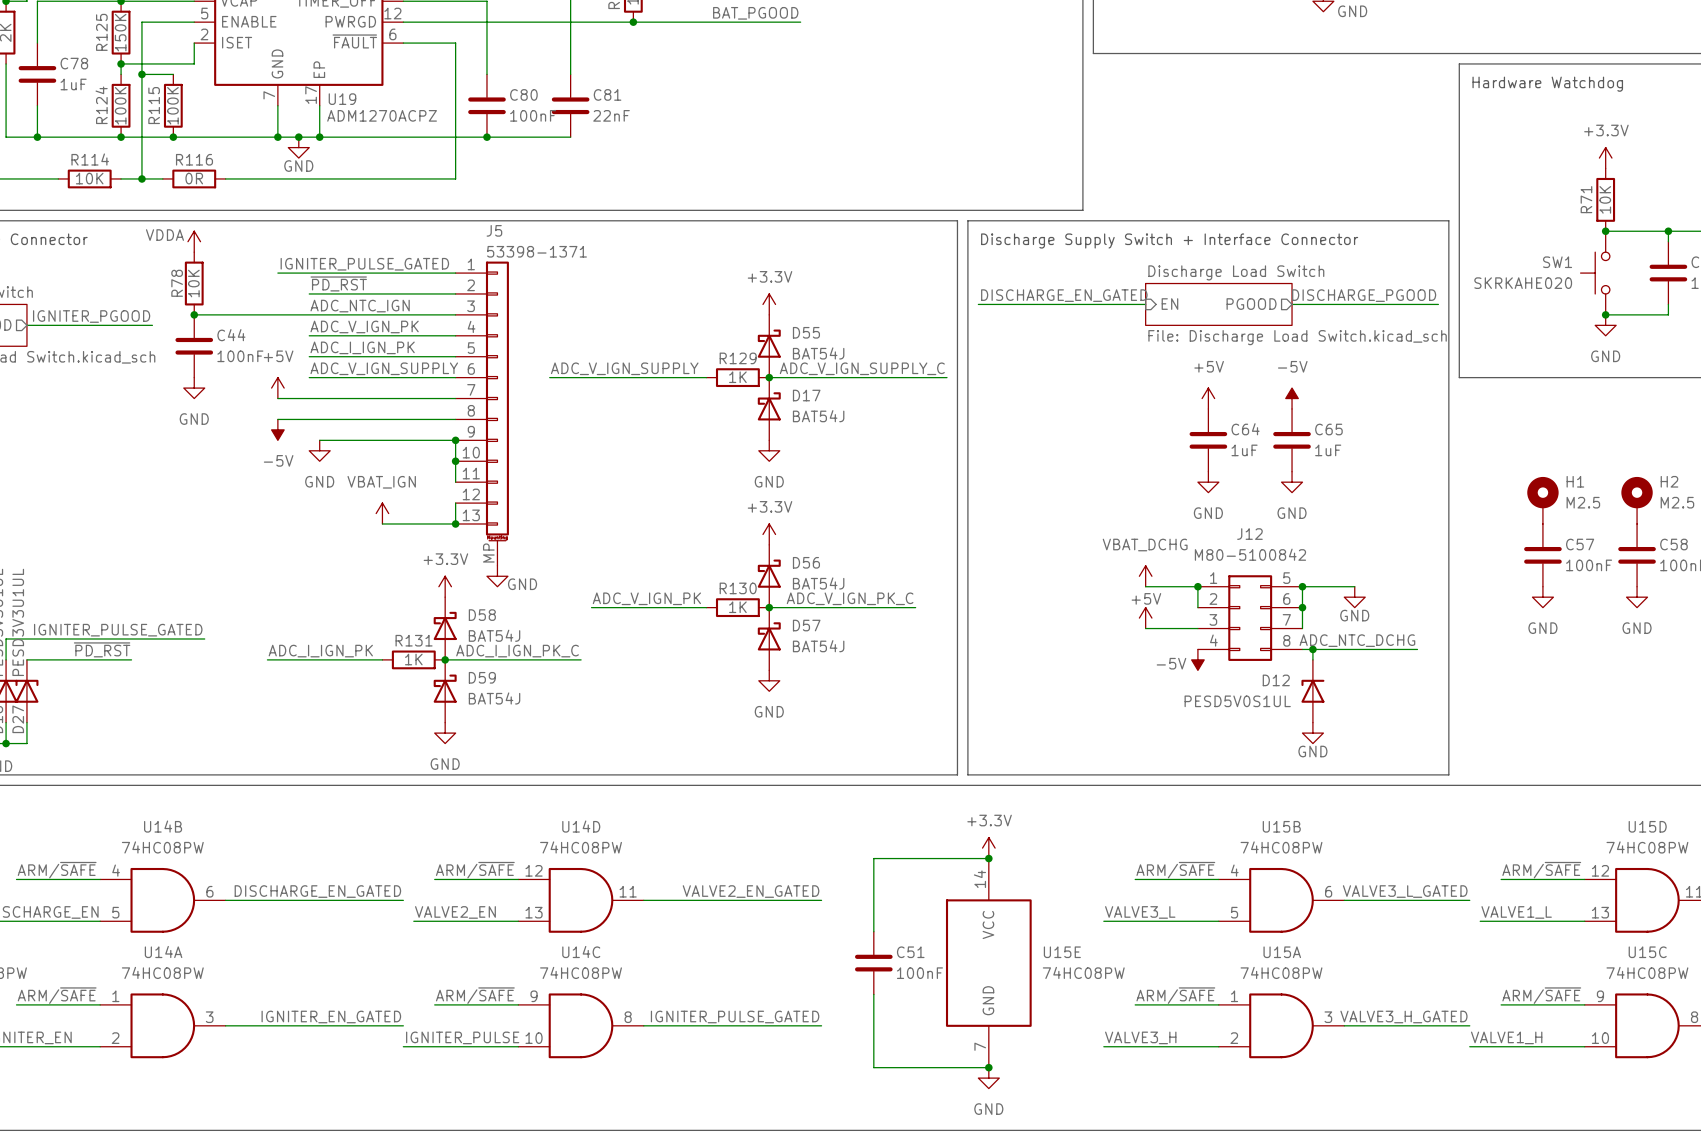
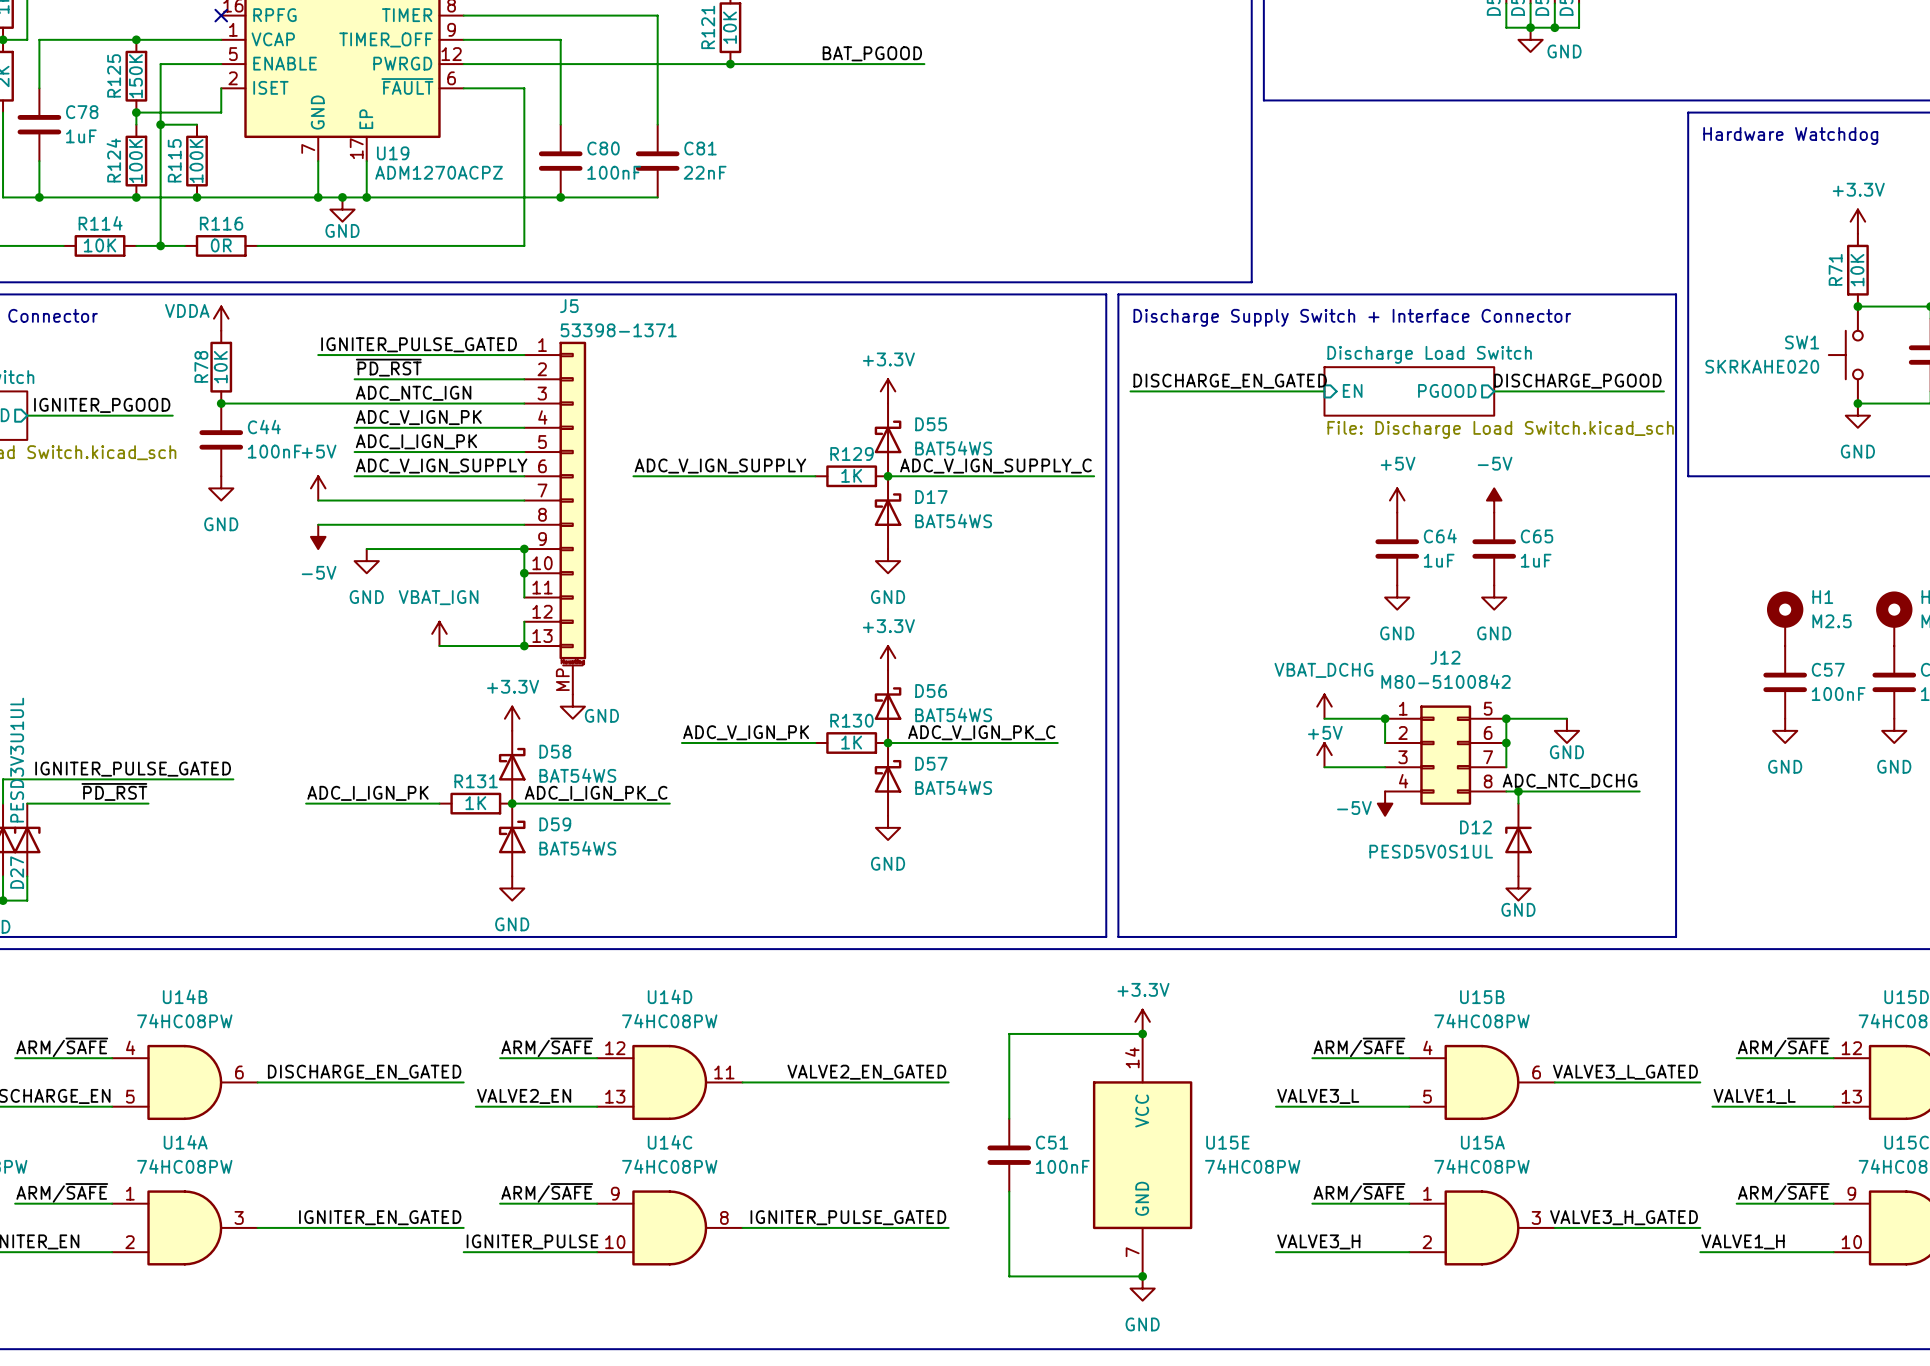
D55 value: BAT54J (818, 353) -> BAT54WS (953, 448)
D17 value: BAT54J (818, 416) -> BAT54WS (953, 521)
D56 value: BAT54J (818, 583) -> BAT54WS (953, 714)
D58 value: BAT54J (494, 635) -> BAT54WS (577, 775)
D57 value: BAT54J (818, 646) -> BAT54WS (953, 787)
D59 value: BAT54J (494, 698) -> BAT54WS (577, 848)

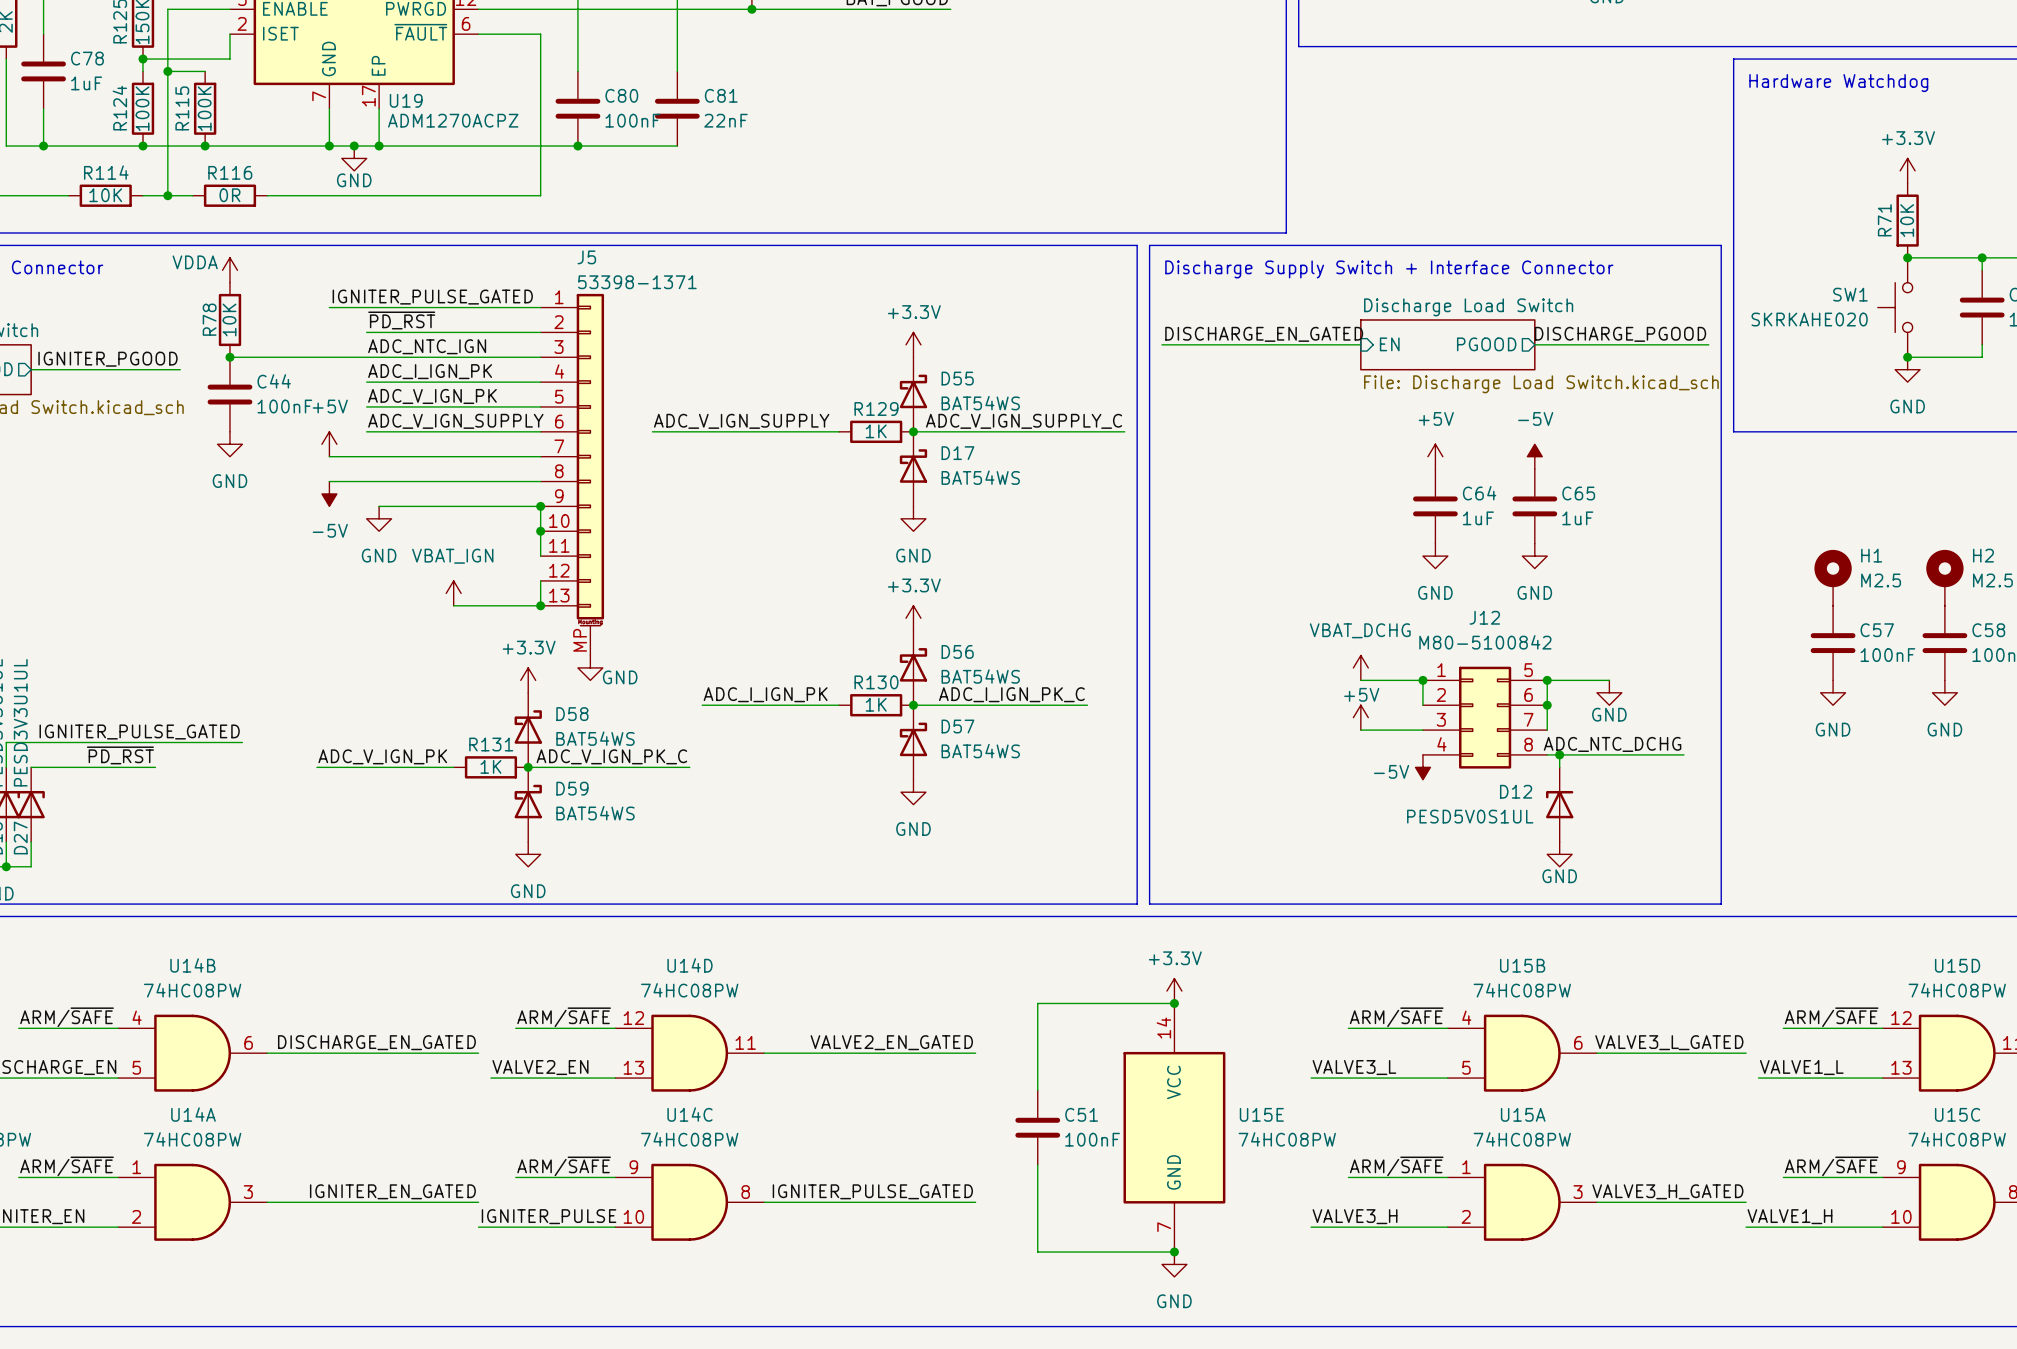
label: ADC_V_IGN_PK (418, 417) -> ADC_I_IGN_PK (430, 371)
label: ADC_I_IGN_PK (416, 441) -> ADC_V_IGN_PK (432, 396)
label: ADC_V_IGN_PK (746, 732) -> ADC_I_IGN_PK (765, 694)
label: ADC_V_IGN_PK_C (981, 732) -> ADC_I_IGN_PK_C (1011, 694)
label: ADC_I_IGN_PK (367, 793) -> ADC_V_IGN_PK (382, 756)
label: ADC_I_IGN_PK_C (596, 793) -> ADC_V_IGN_PK_C (611, 756)

